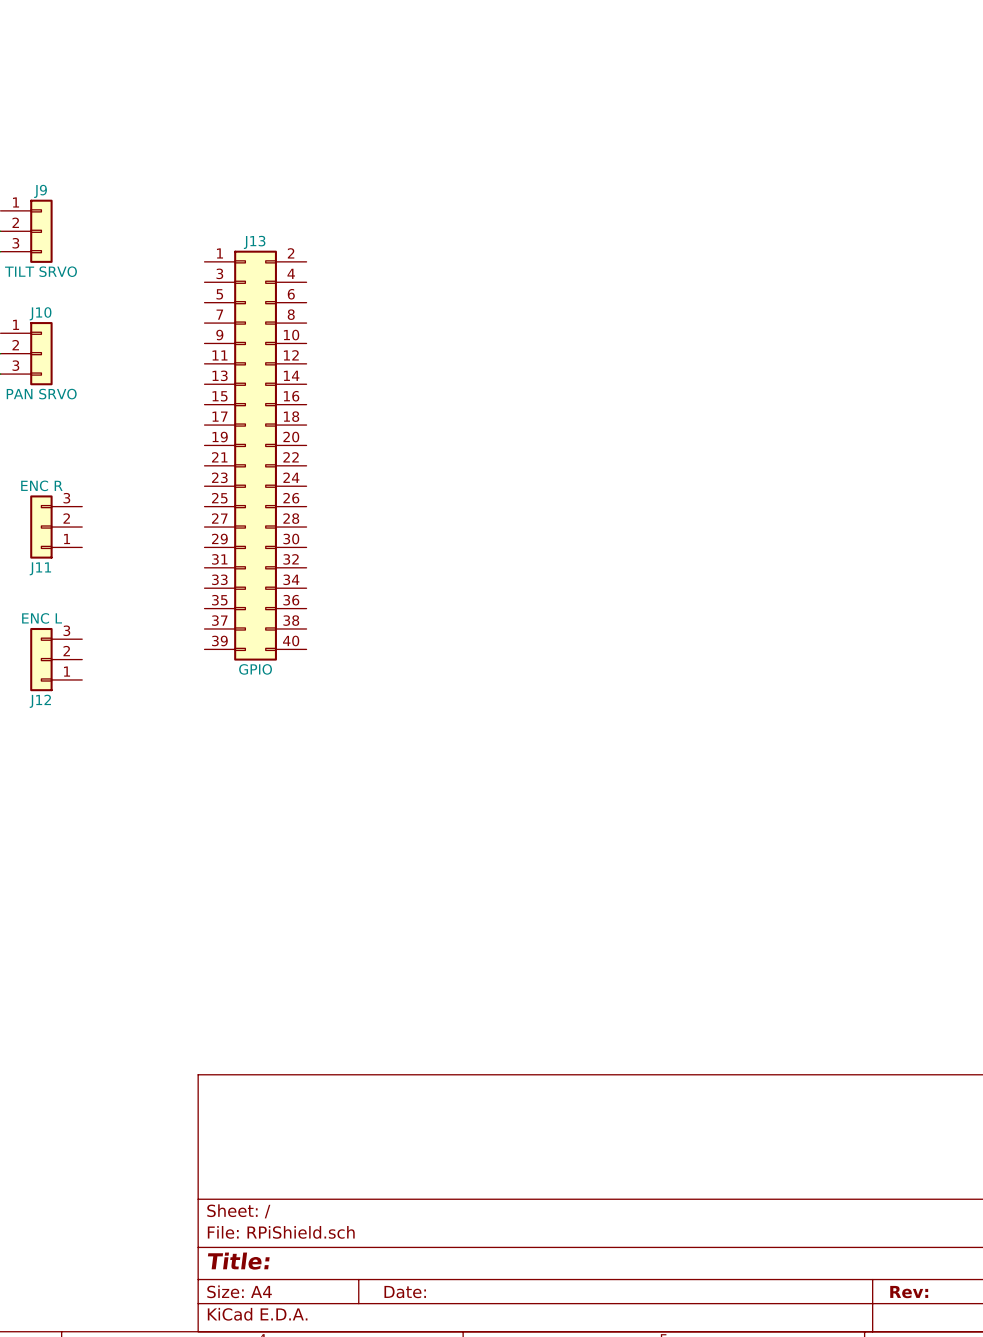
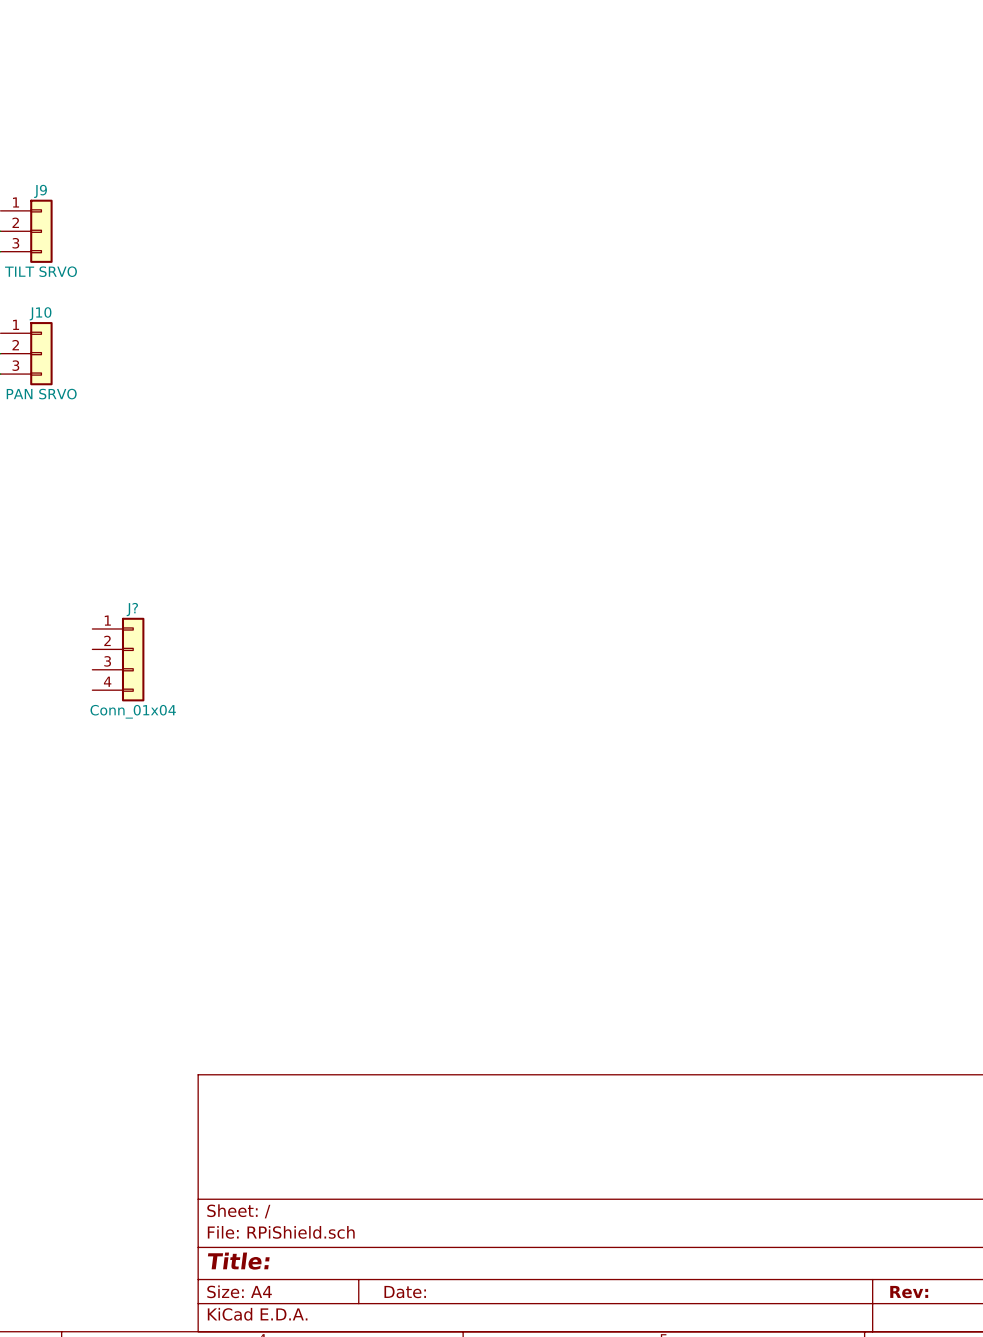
J13: GPIO (255, 455) -> none
J11: ENC R (56, 527) -> none
J12: ENC L (56, 659) -> none
J?: none -> Conn_01x04 (118, 659)

